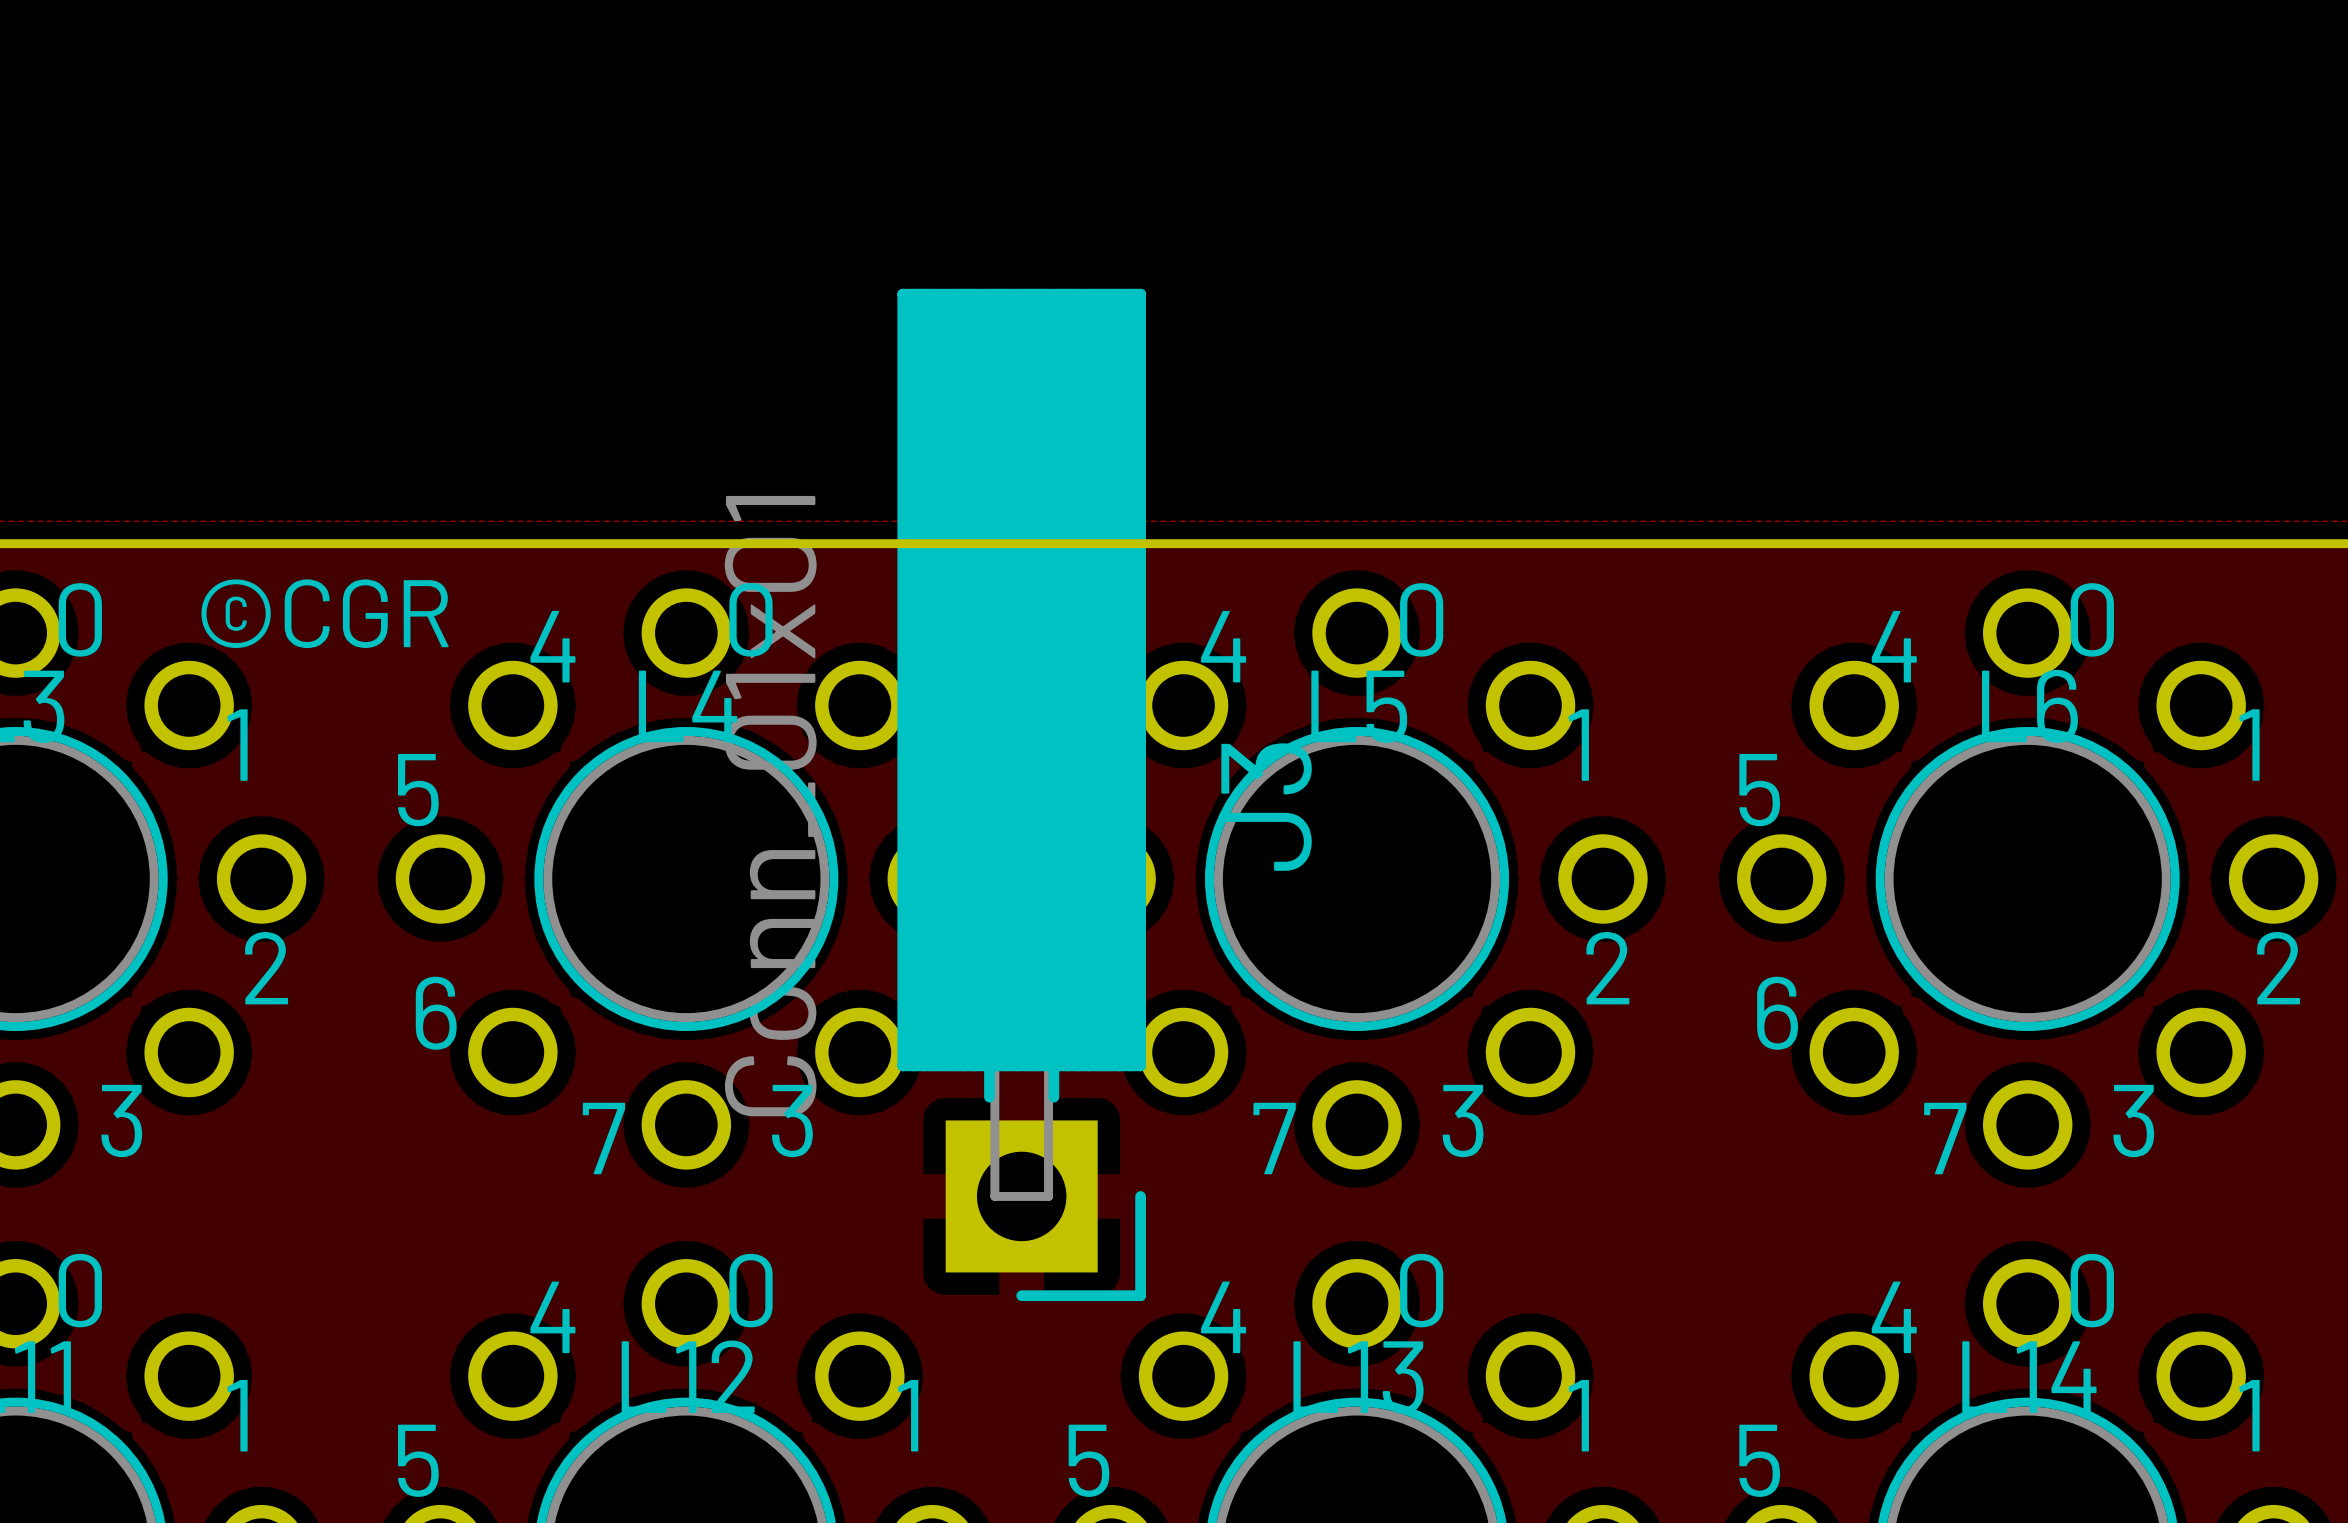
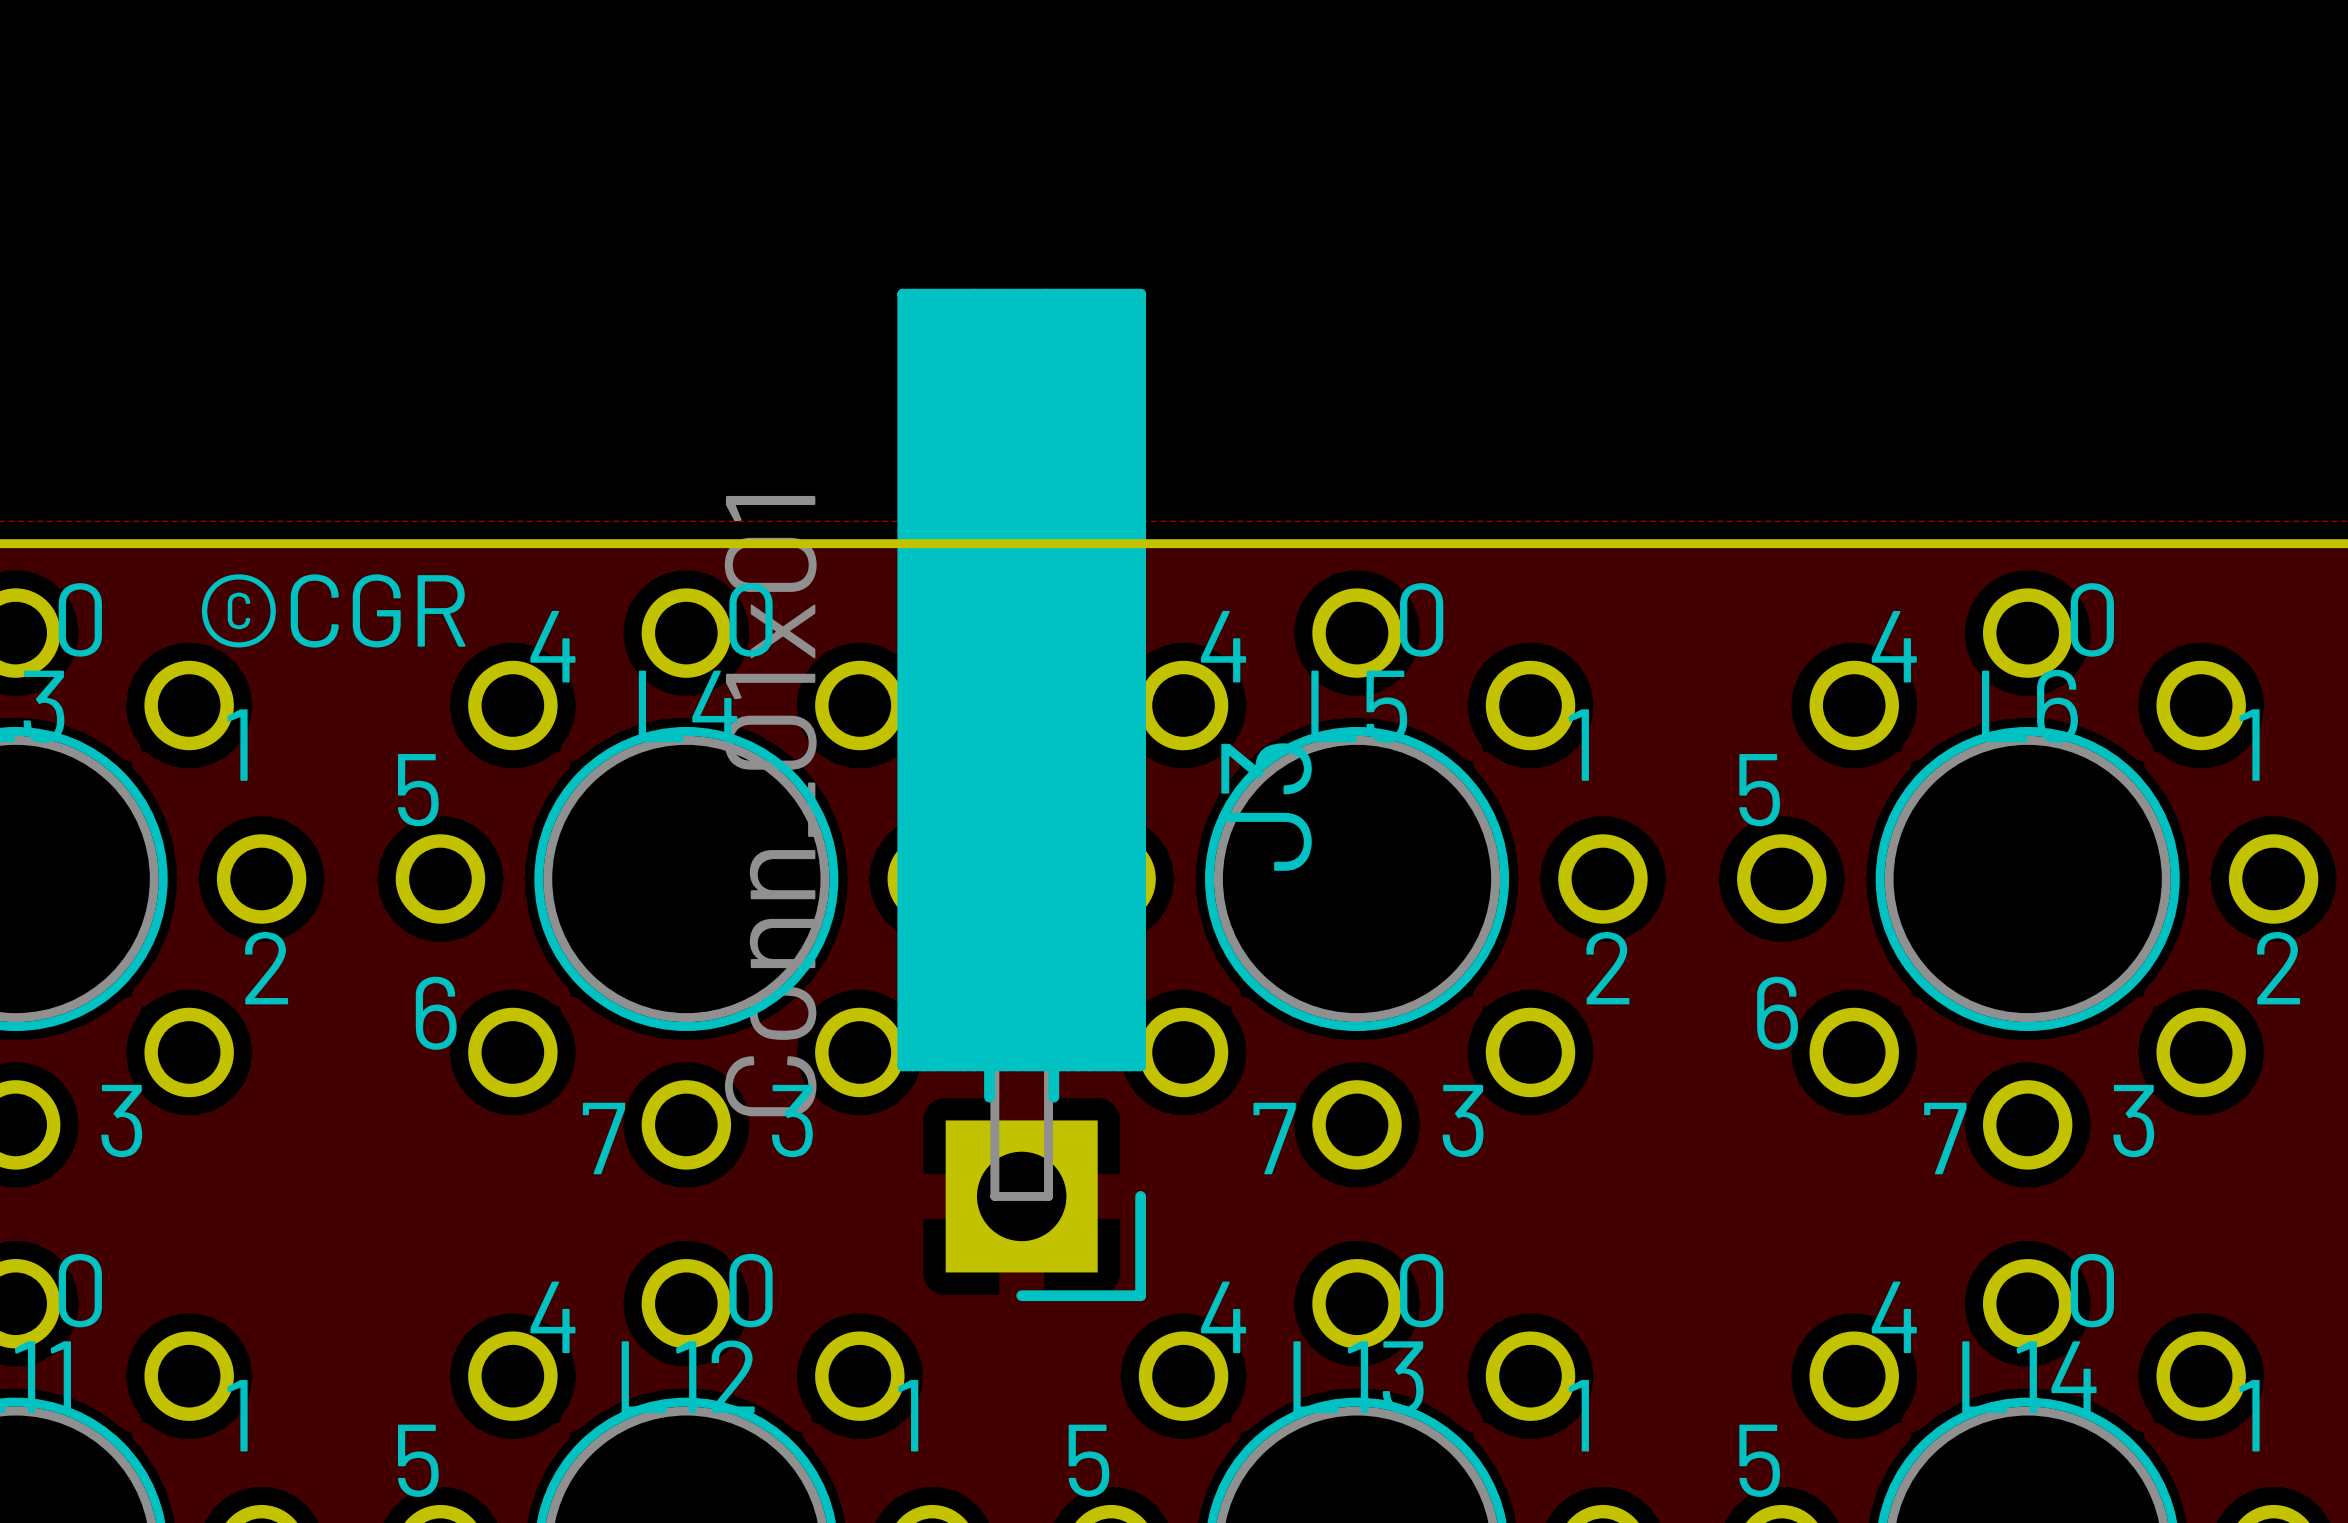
text position: ©CGR (325, 613) -> ©CGR (333, 610)

